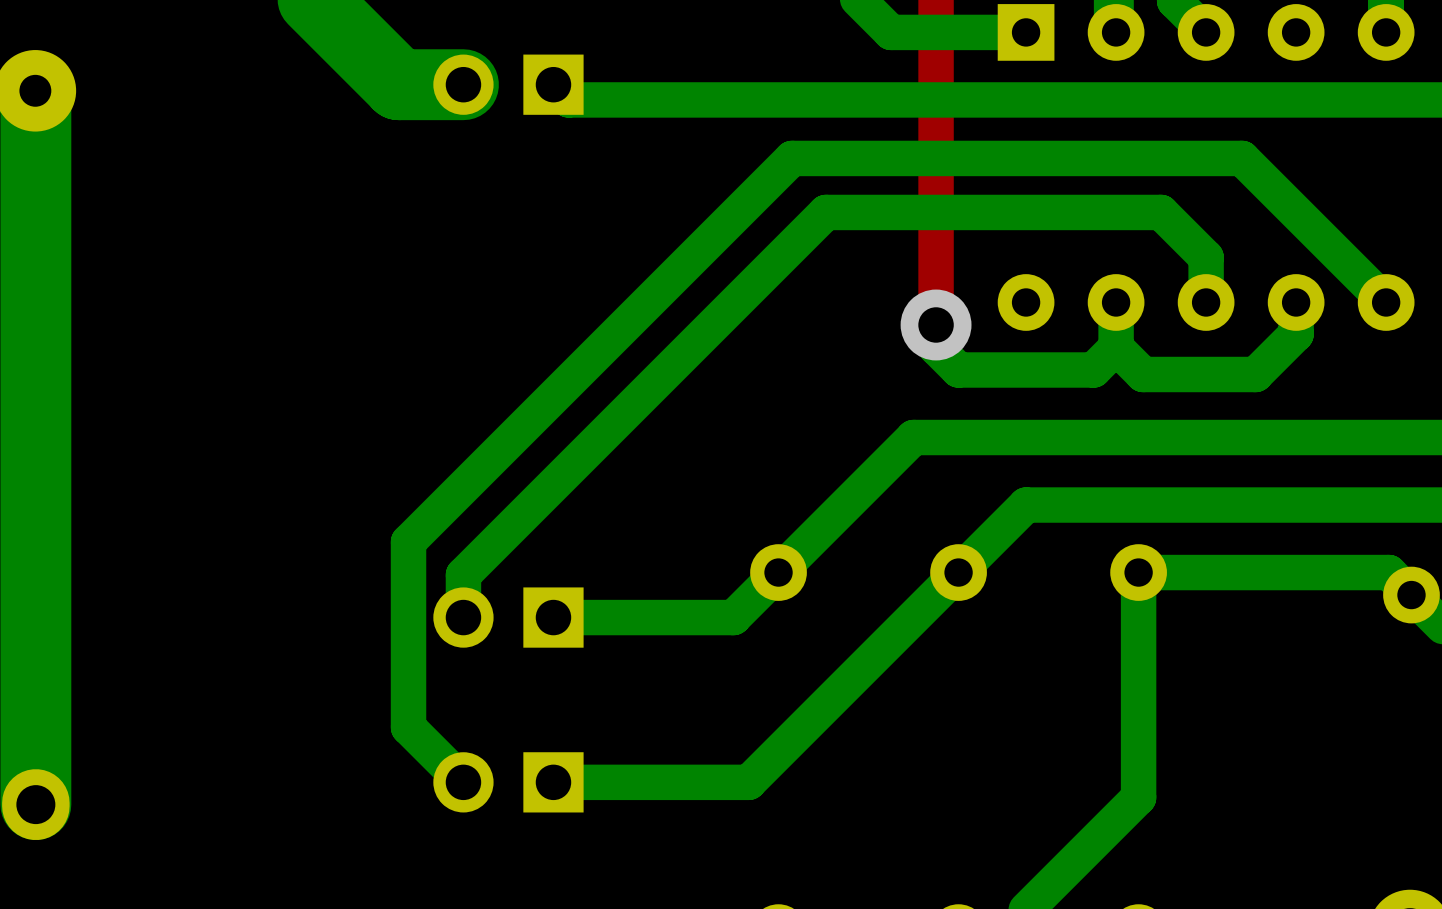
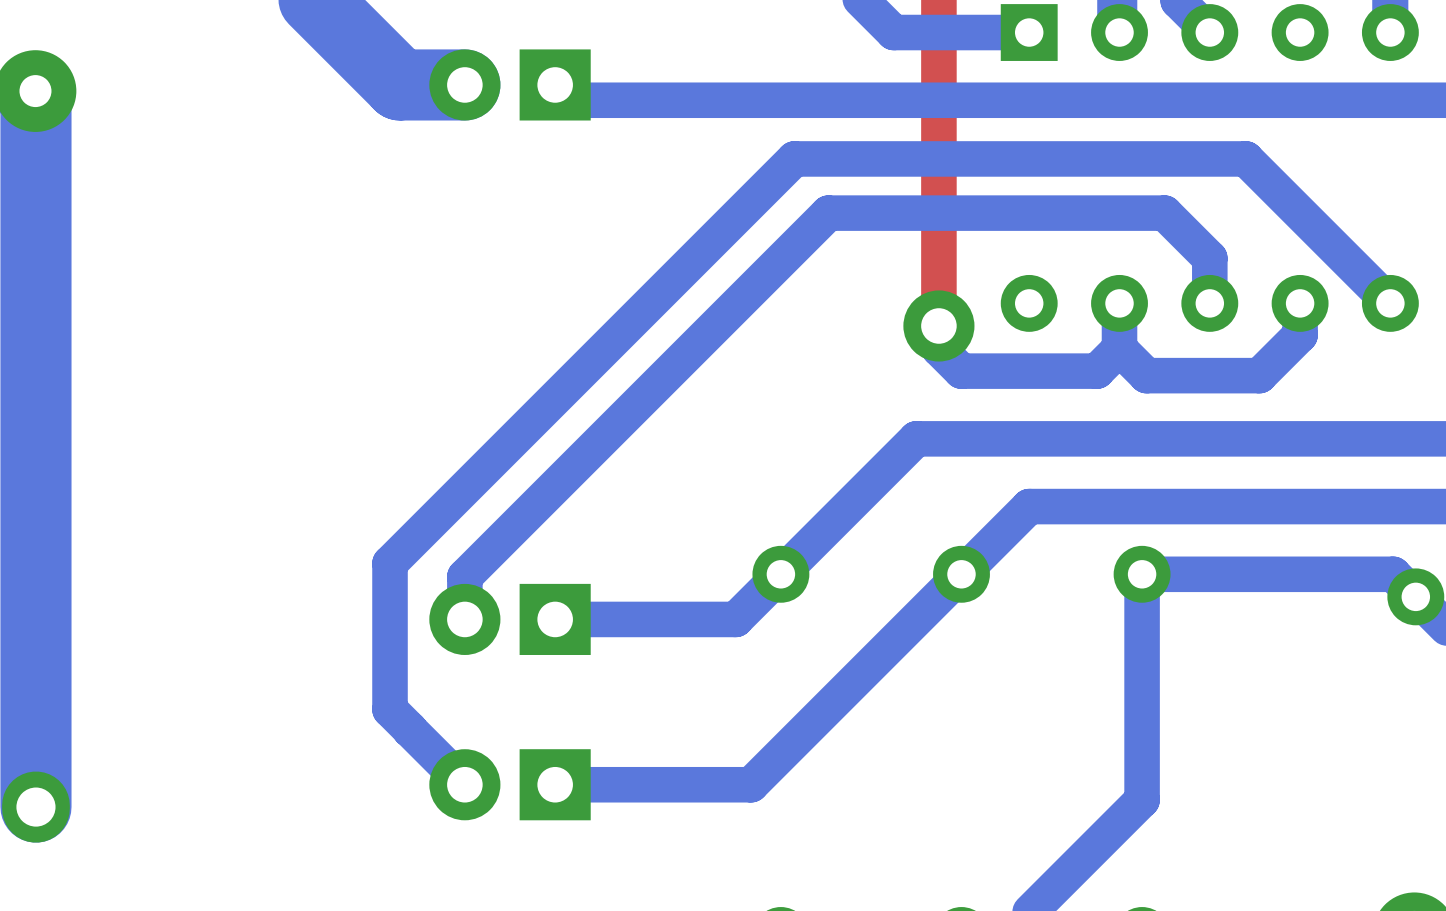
part footprint: [433, 54, 584, 115] -> [429, 49, 591, 121]
bottom track: (408, 541) (408, 727) -> (409, 543) (390, 563) (390, 709) (409, 729)
part footprint: [433, 587, 584, 648] -> [429, 583, 591, 655]
part footprint: [433, 752, 584, 813] -> [429, 749, 591, 821]

